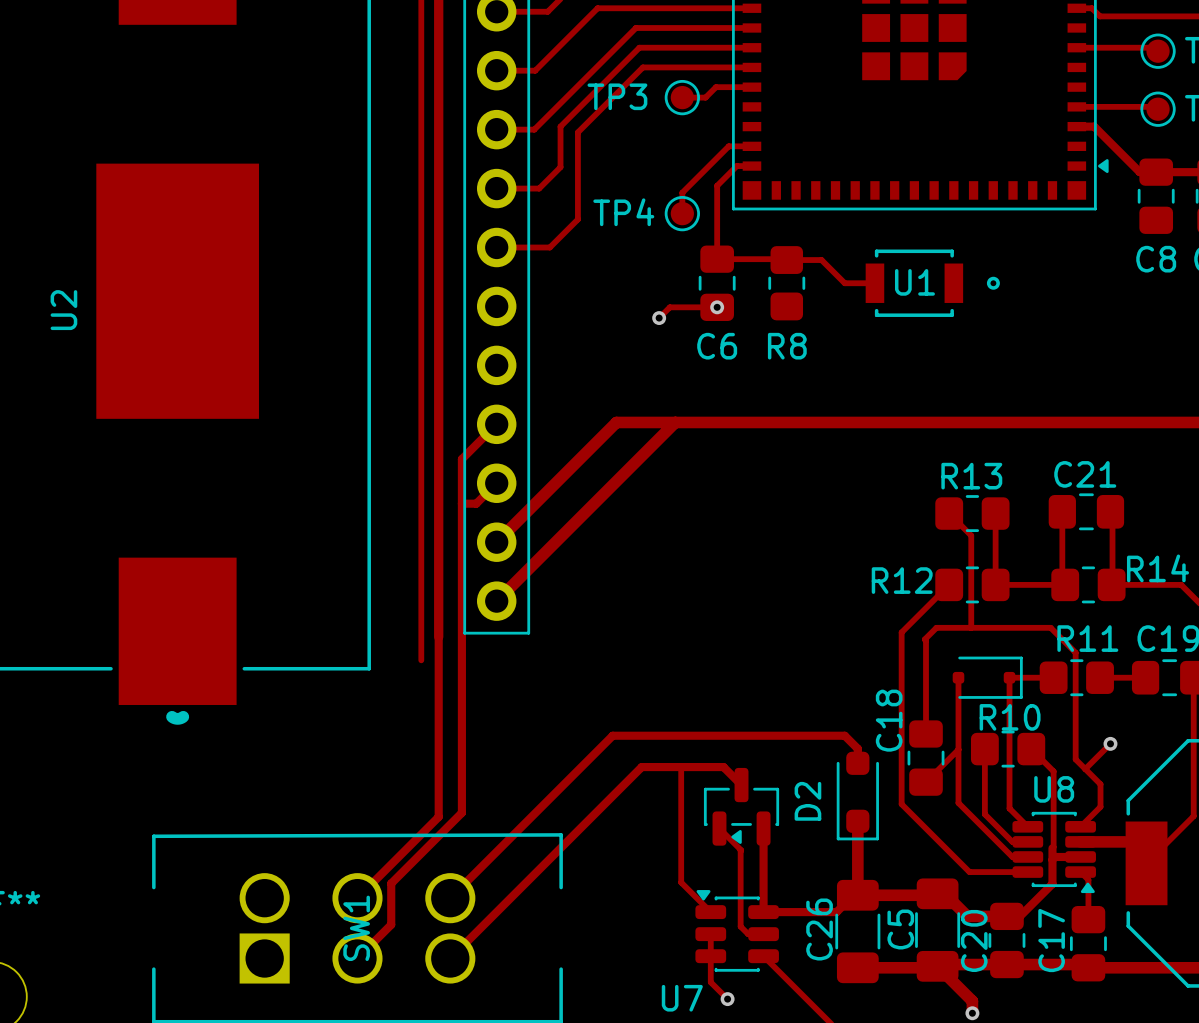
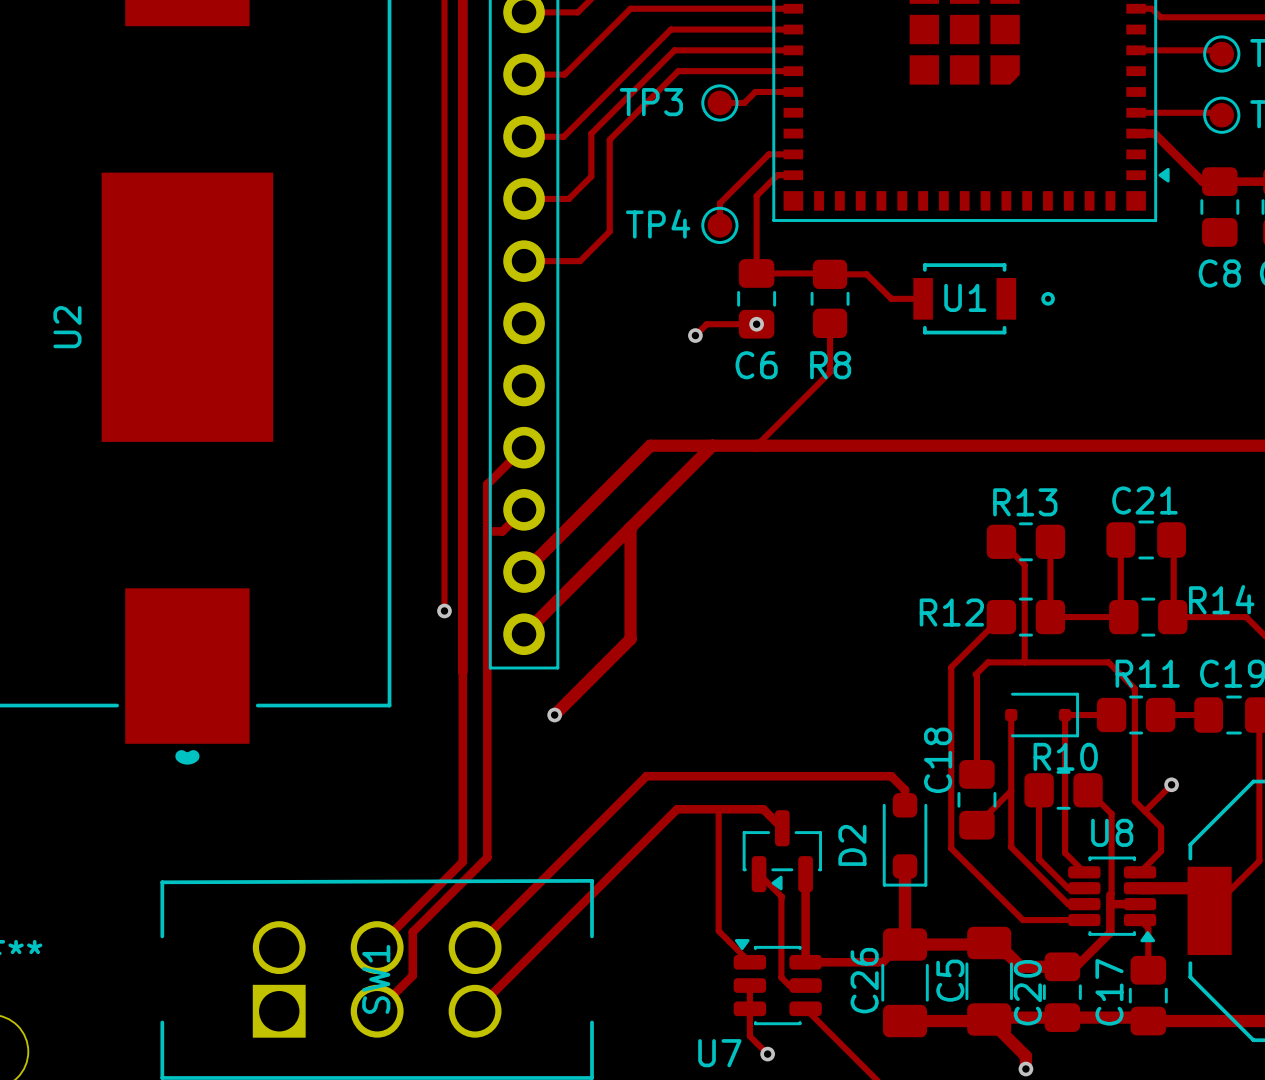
track: none -> (830, 323) (830, 372) (756, 445)
track: none -> (630, 527) (630, 639) (554, 715)
track: (421, 579) (421, 660) -> none
via: none -> (444, 610)
via: none -> (554, 715)

